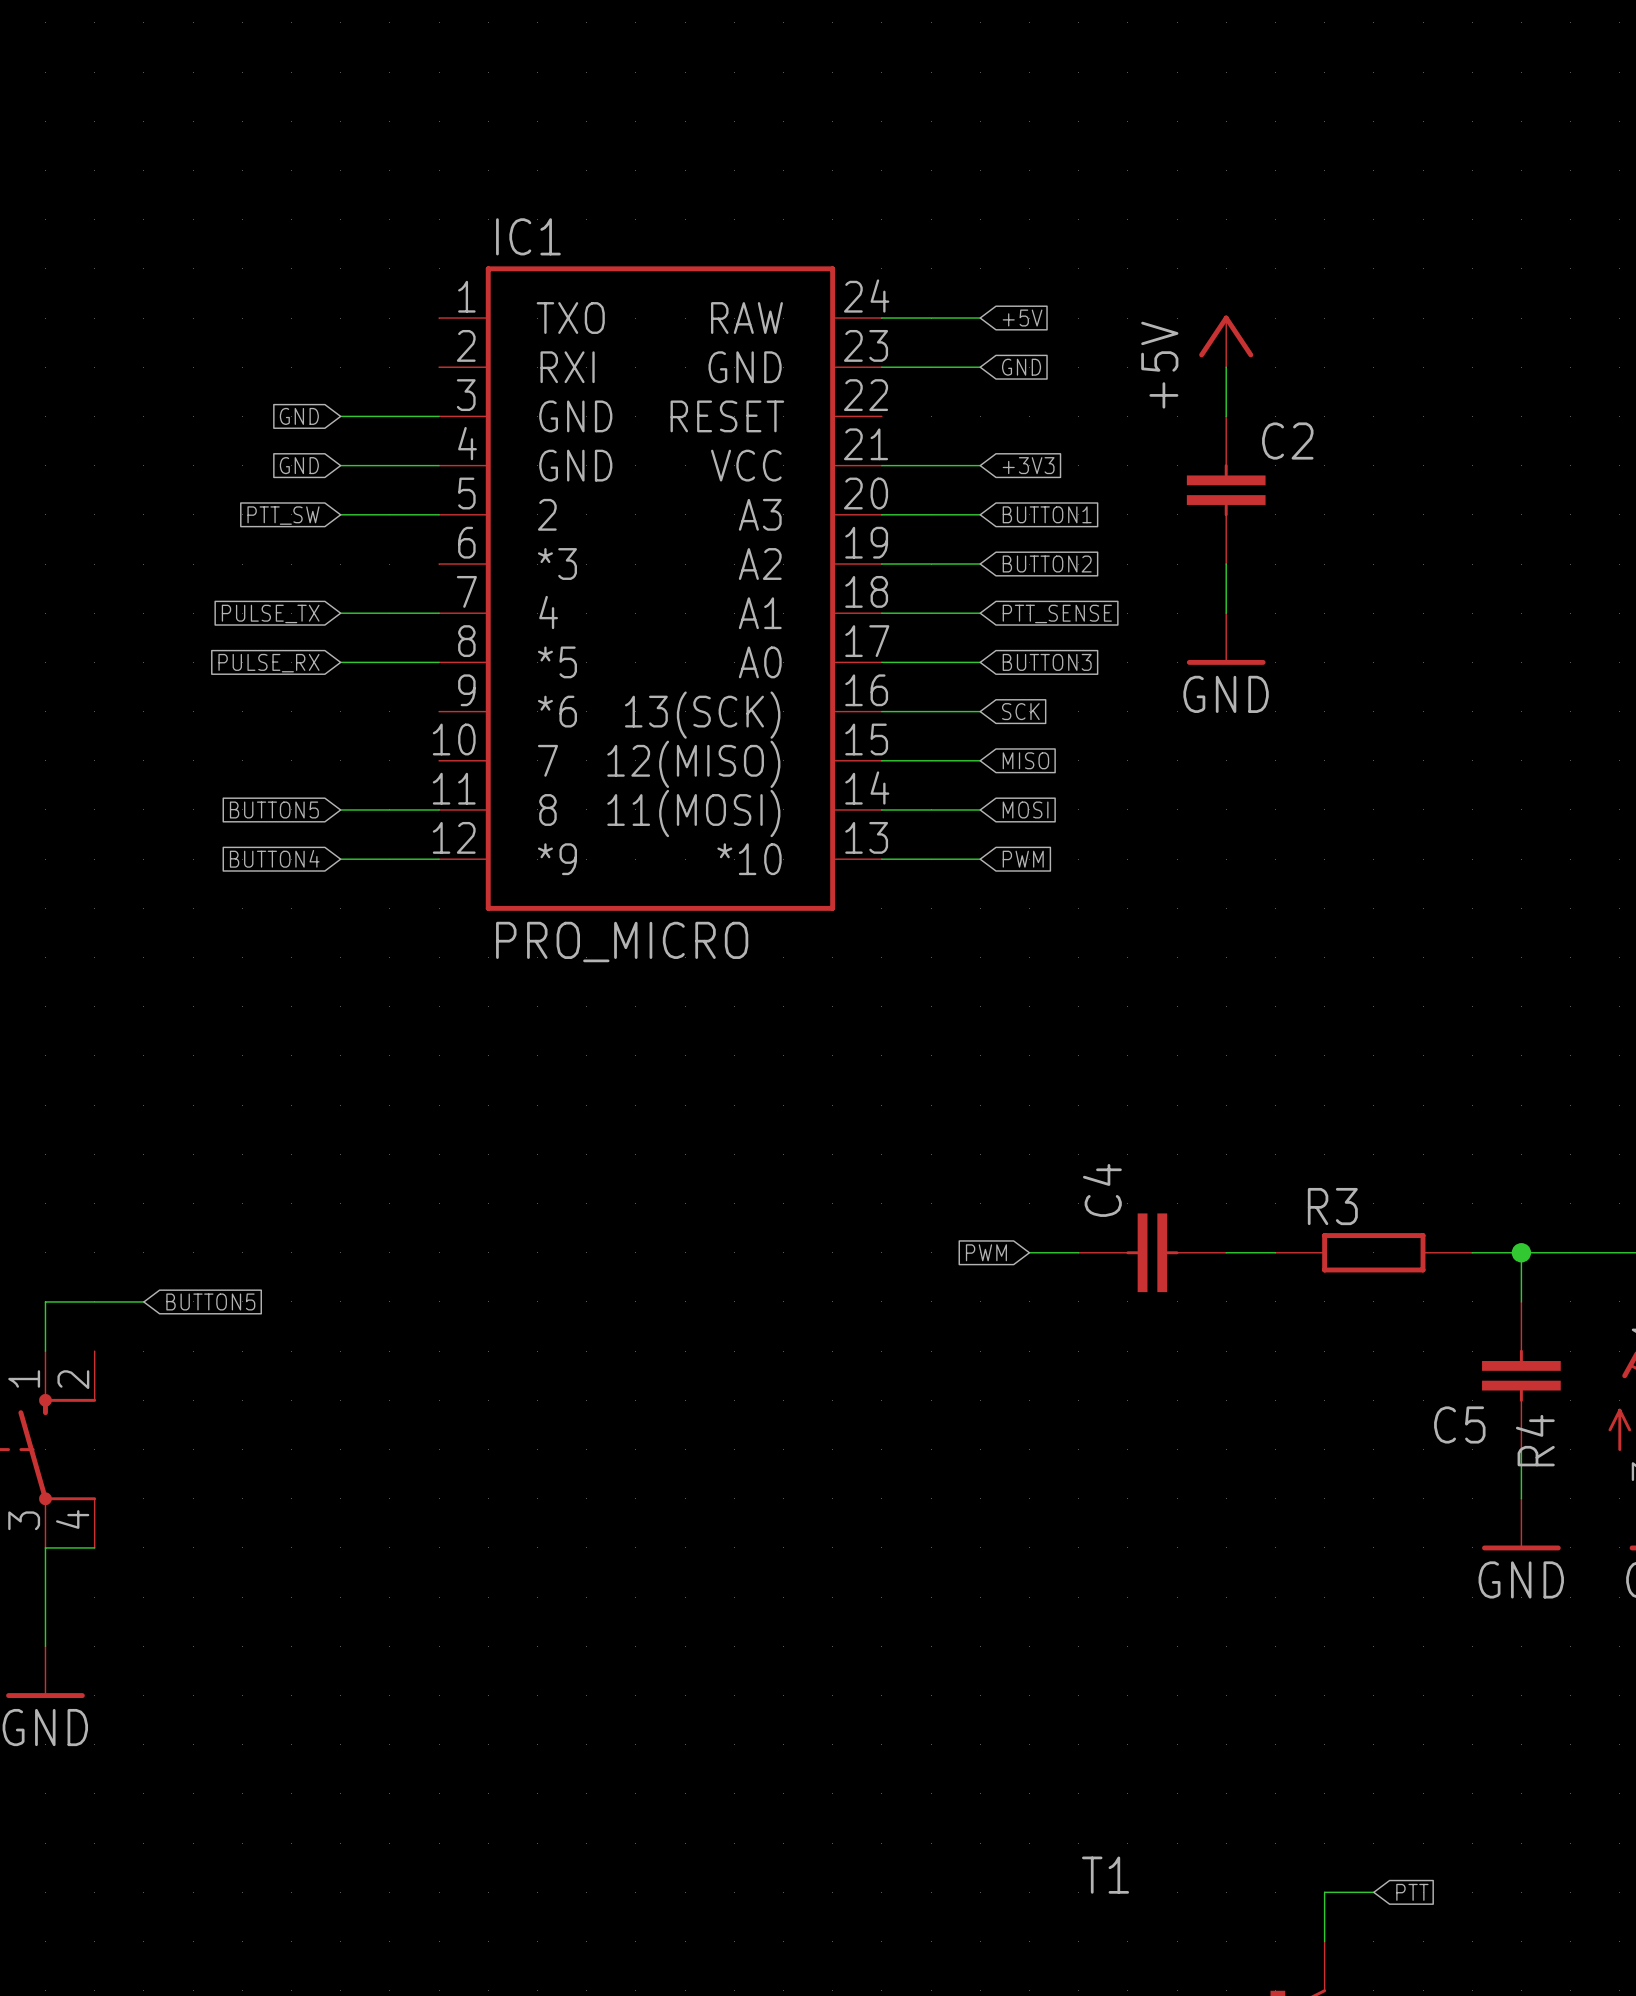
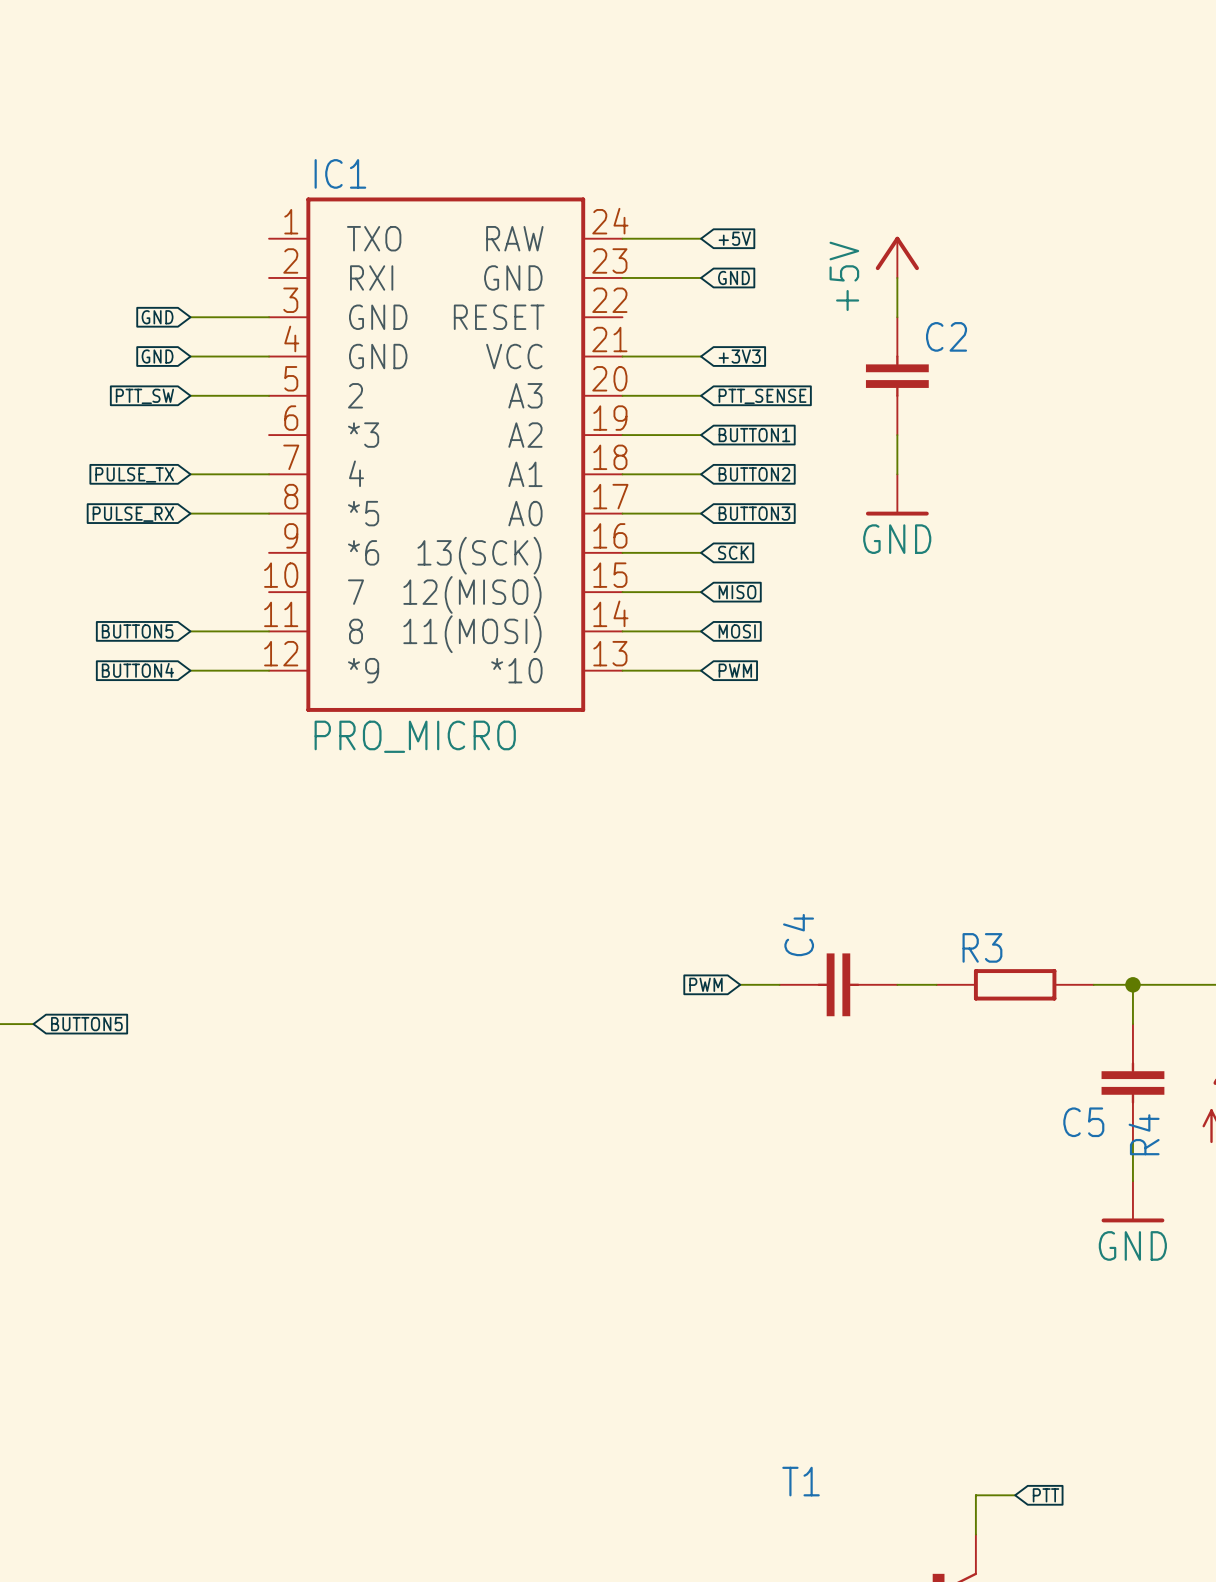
global label: BUTTON1 (1047, 514) -> PTT_SENSE (762, 396)
global label: BUTTON2 (1047, 564) -> BUTTON1 (754, 435)
global label: PTT_SENSE (1057, 613) -> BUTTON2 (754, 474)

